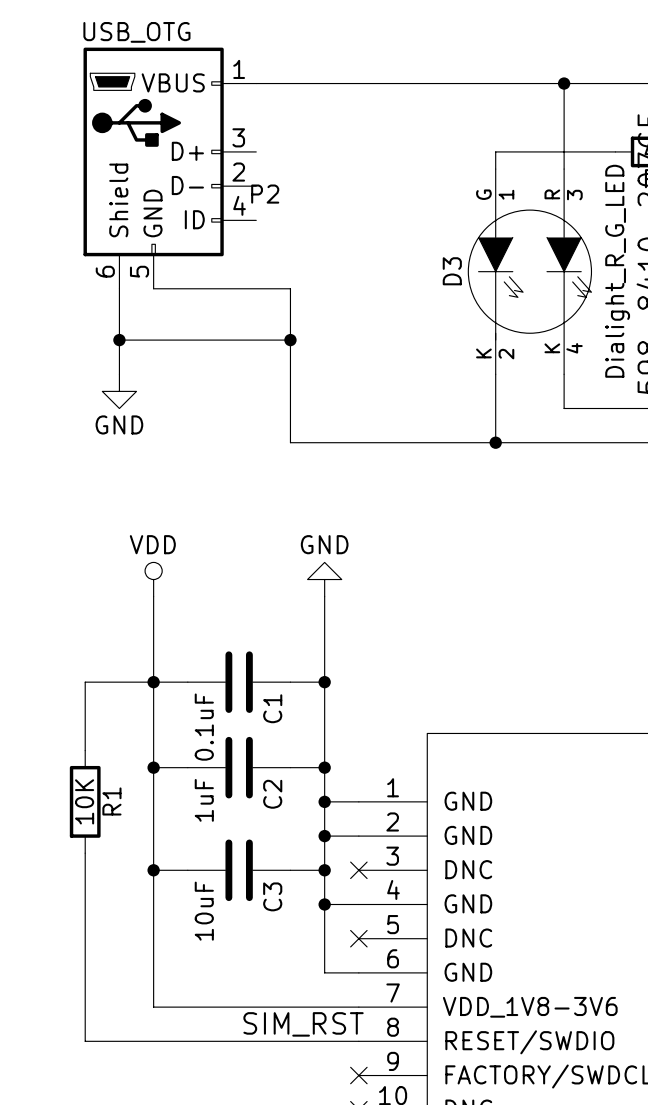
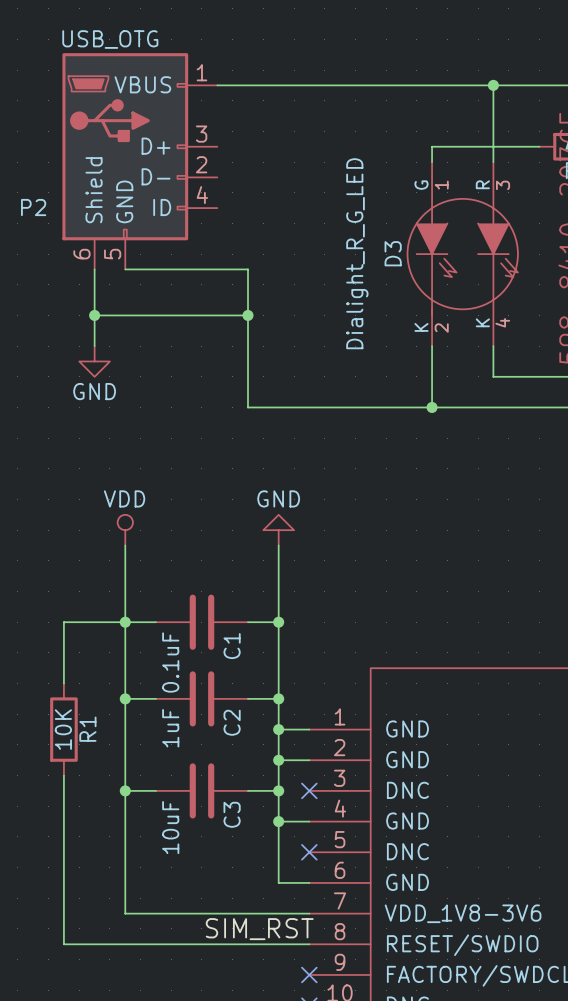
P2 name position: P2 (265, 194) -> P2 (33, 207)
D3 value position: Dialight_R_G_LED (617, 271) -> Dialight_R_G_LED (357, 253)

